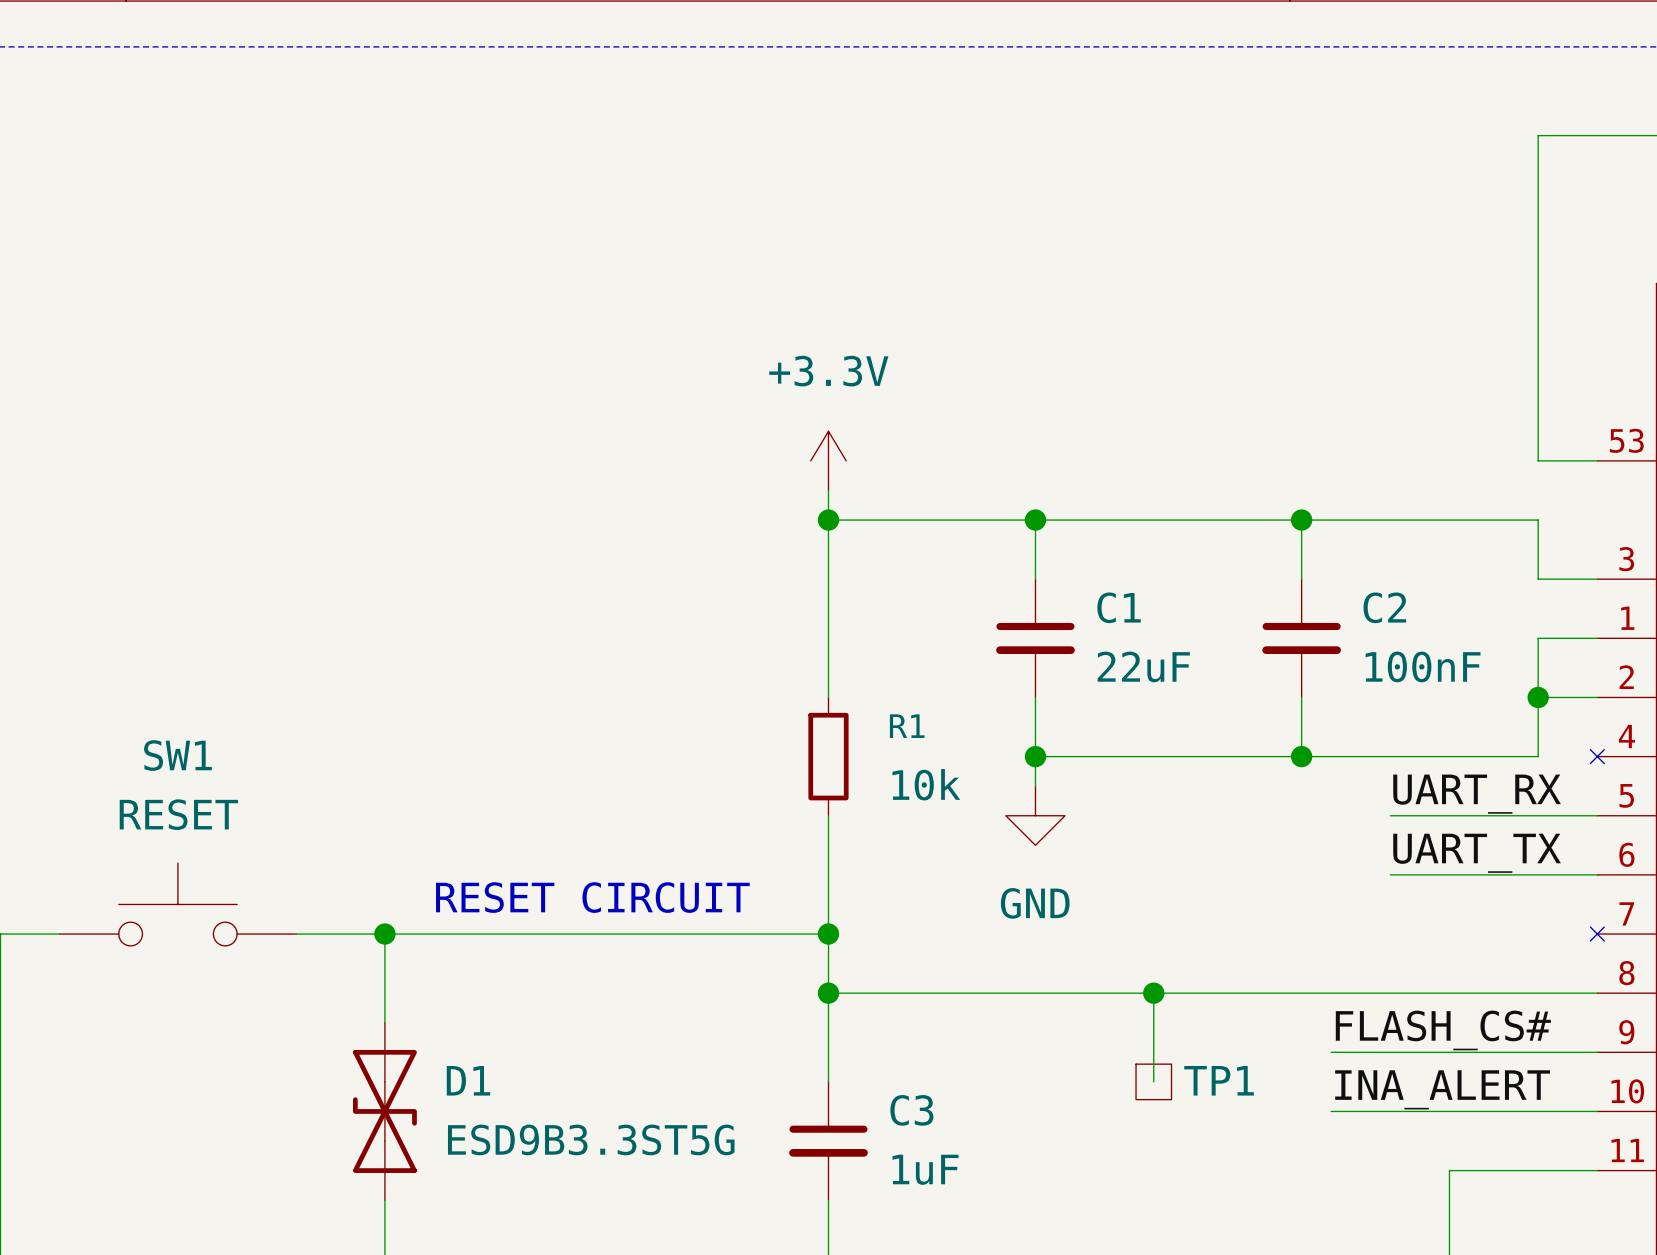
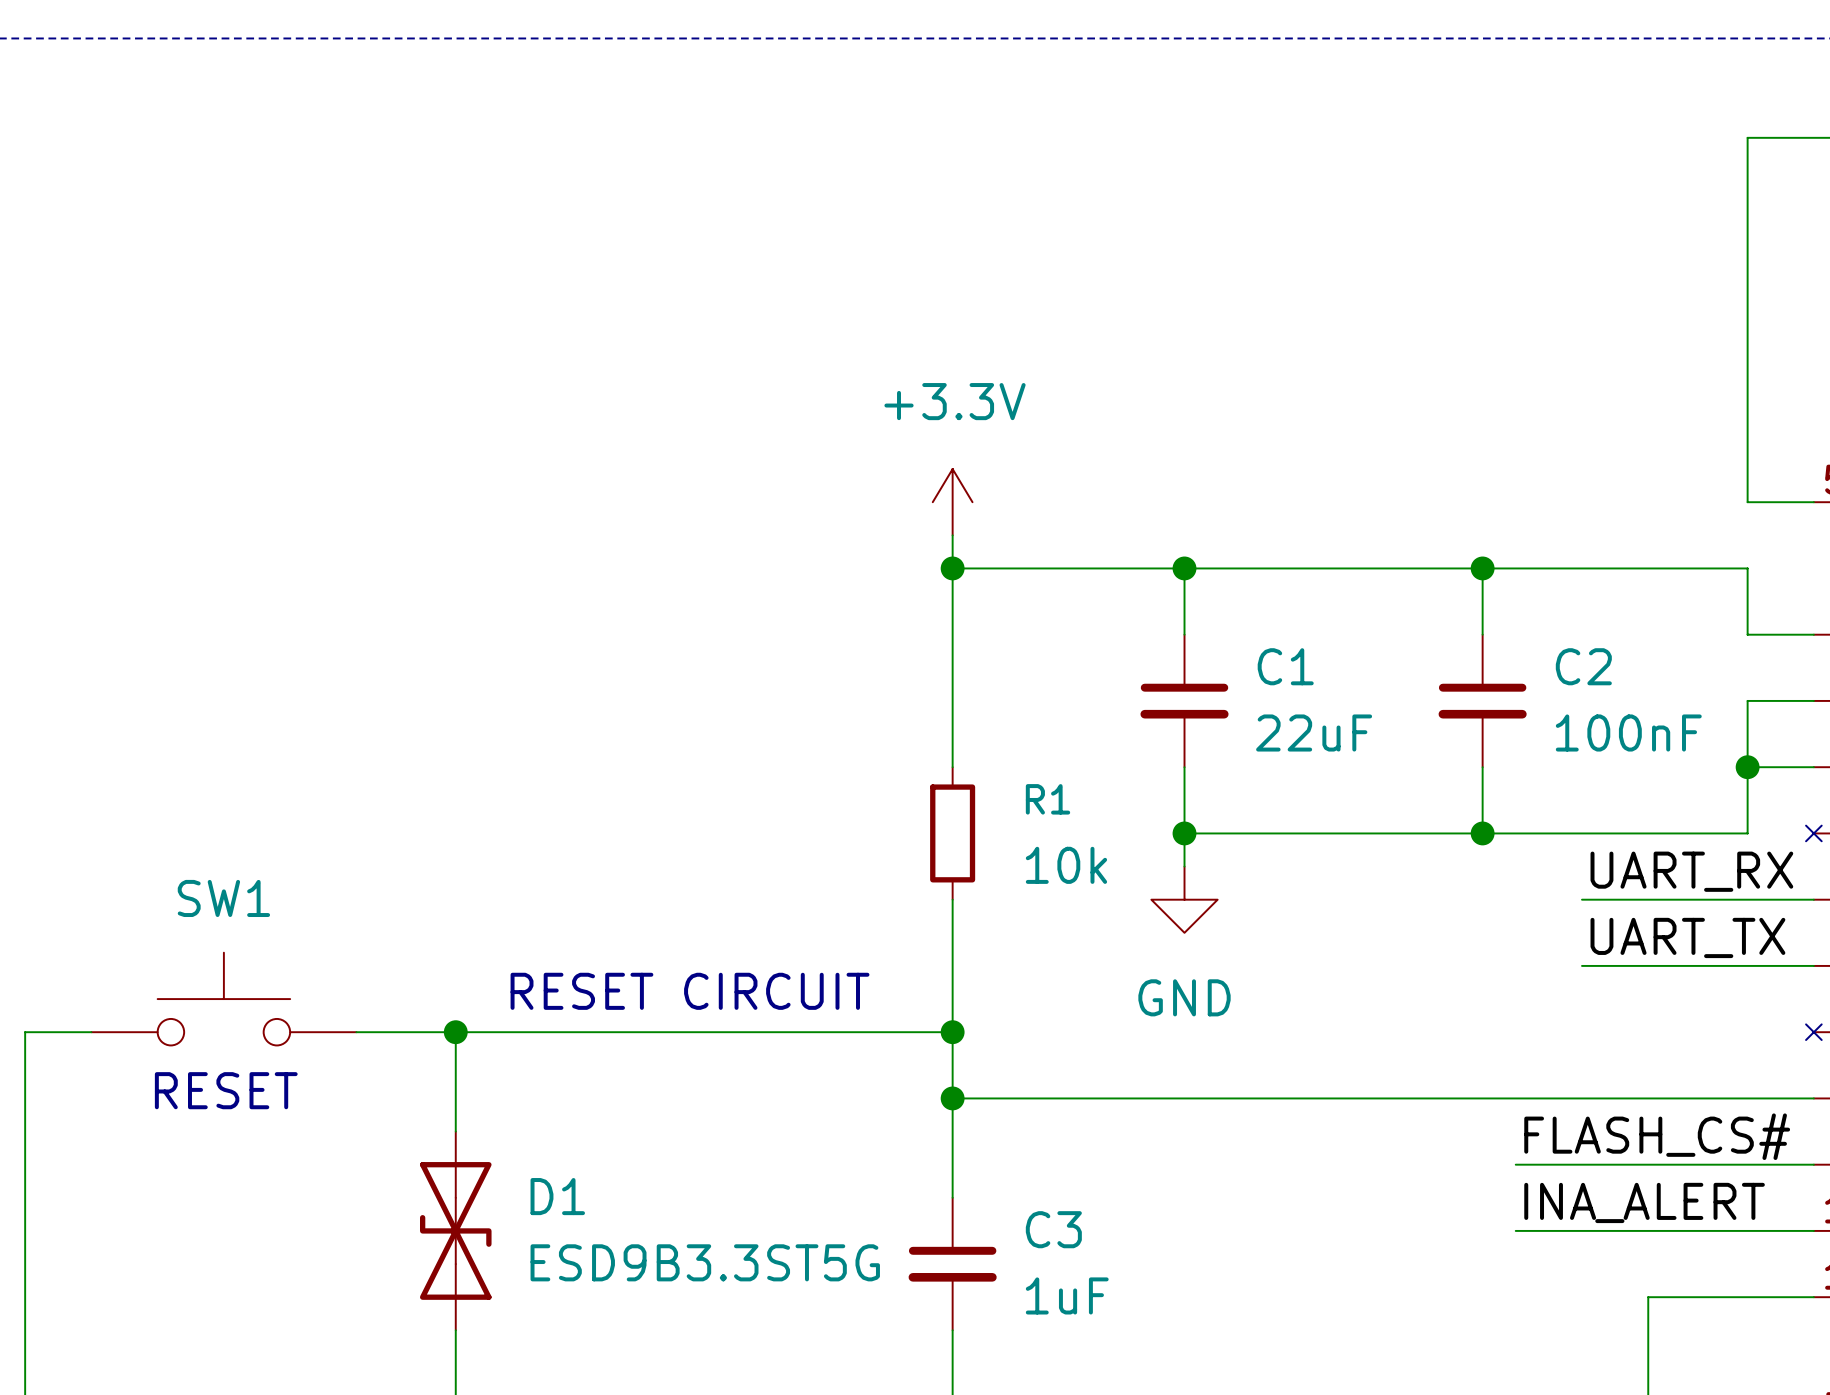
SW1 name position: SW1 (177, 755) -> SW1 (223, 898)
SW1 value: RESET (178, 814) -> none
text: none -> RESET (226, 1090)
wire: (1153, 993) (1153, 1081) -> none
junction: (1153, 993) -> none
TP1: (1153, 1081) -> none

